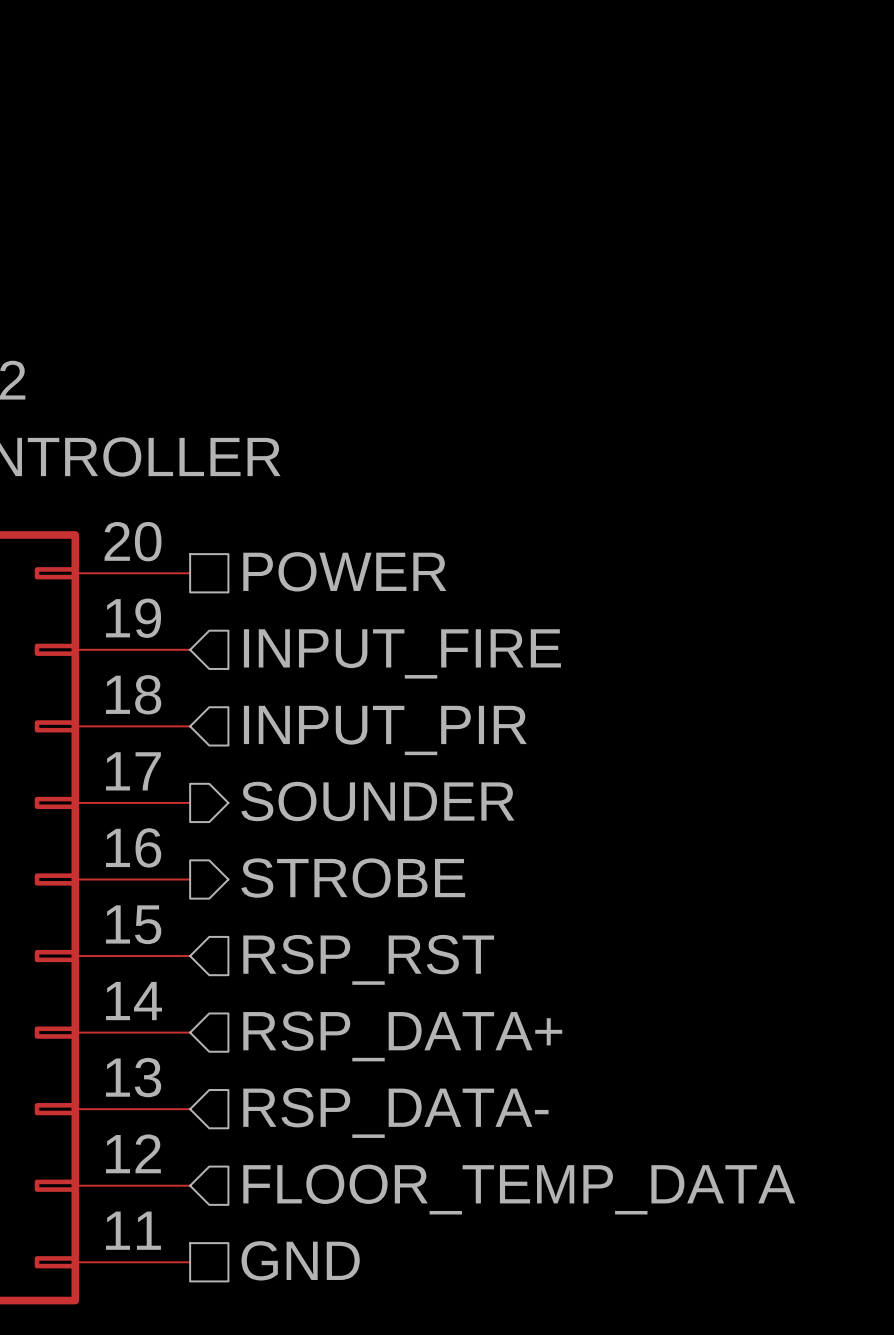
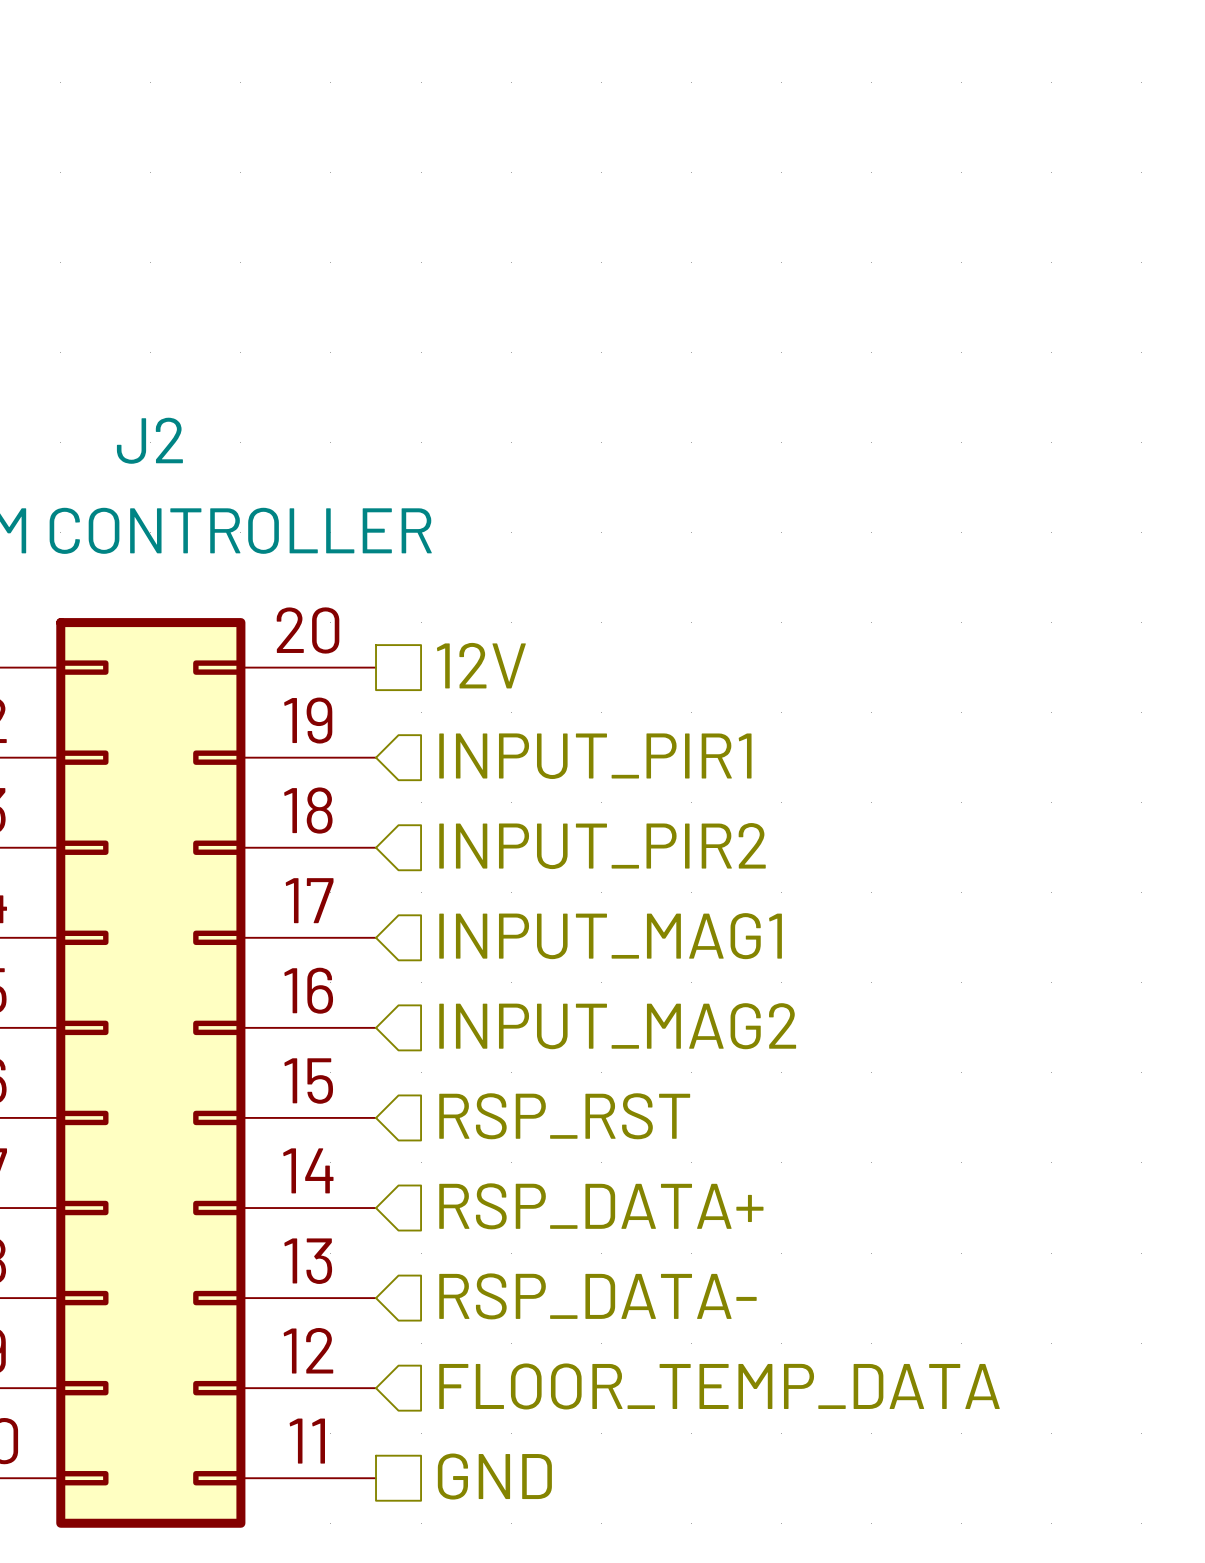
hierarchical label: POWER (344, 571) -> 12V (481, 665)
hierarchical label: INPUT_FIRE (402, 653) -> INPUT_PIR1 (595, 756)
hierarchical label: INPUT_PIR (385, 730) -> INPUT_PIR2 (602, 846)
hierarchical label shape: output (377, 801) -> input (610, 936)
hierarchical label: SOUNDER (377, 801) -> INPUT_MAG1 (610, 936)
hierarchical label shape: output (353, 878) -> input (617, 1026)
hierarchical label: STROBE (353, 878) -> INPUT_MAG2 (617, 1026)

